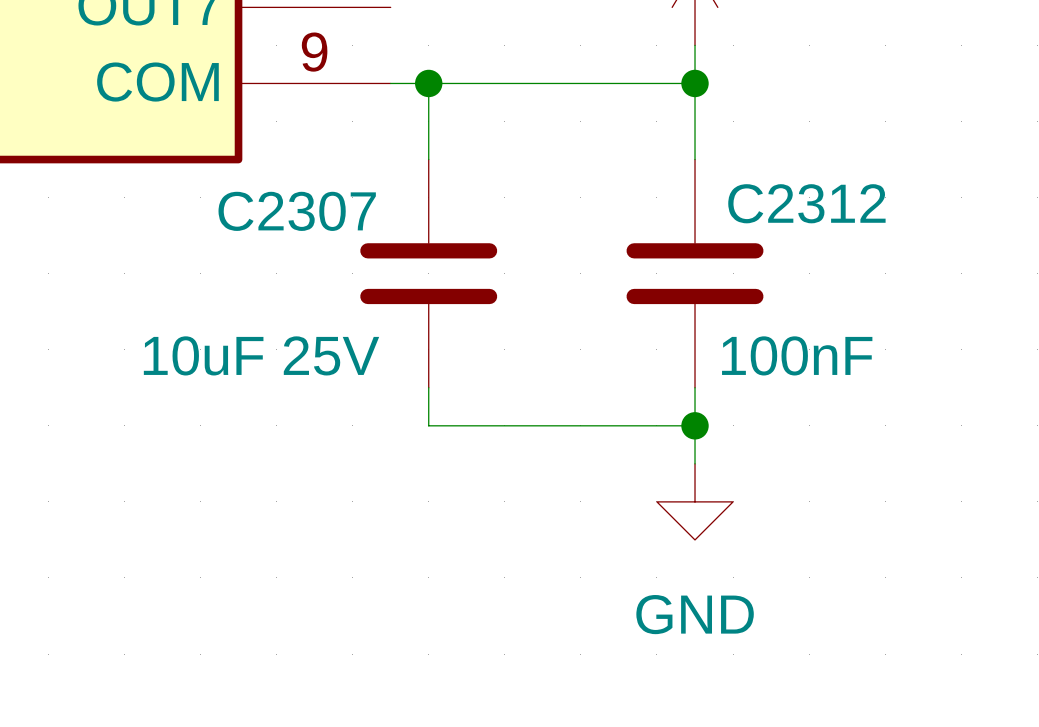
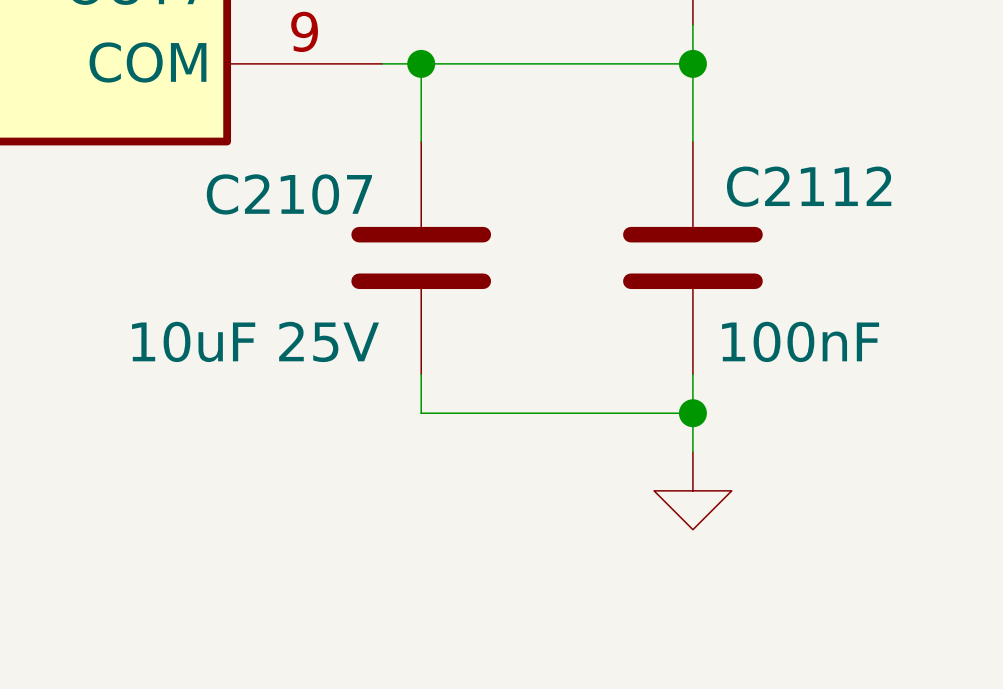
C2312 name: C2312 (806, 203) -> C2112 (809, 186)
C2307 name: C2307 (297, 211) -> C2107 (289, 194)
power symbol text: GND (695, 614) -> none

